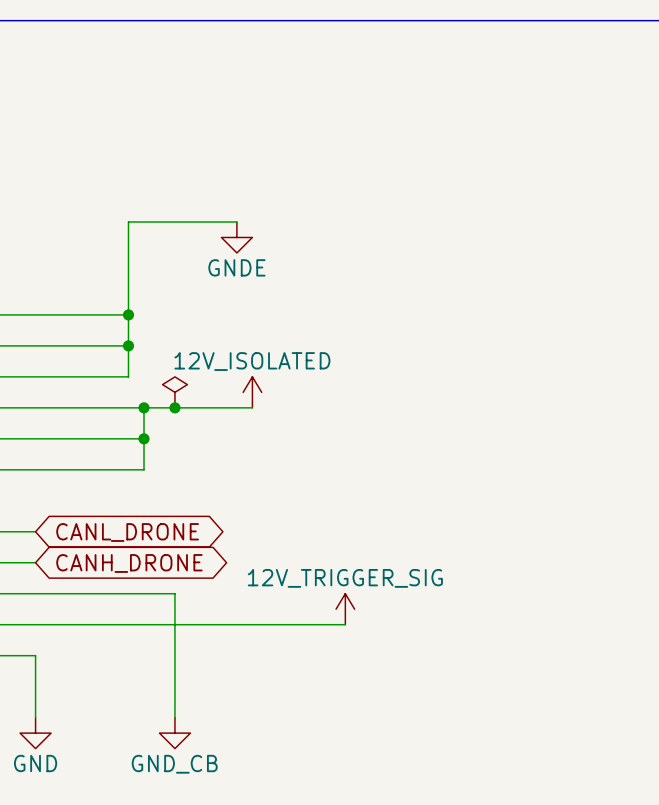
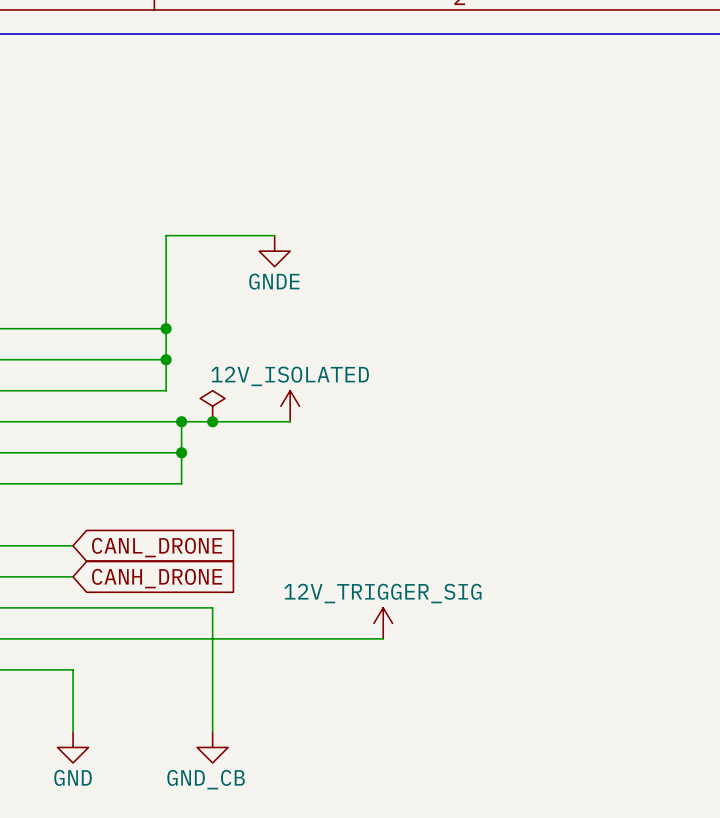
global label shape: bidirectional (127, 532) -> input (157, 547)
global label shape: bidirectional (129, 563) -> input (157, 578)

